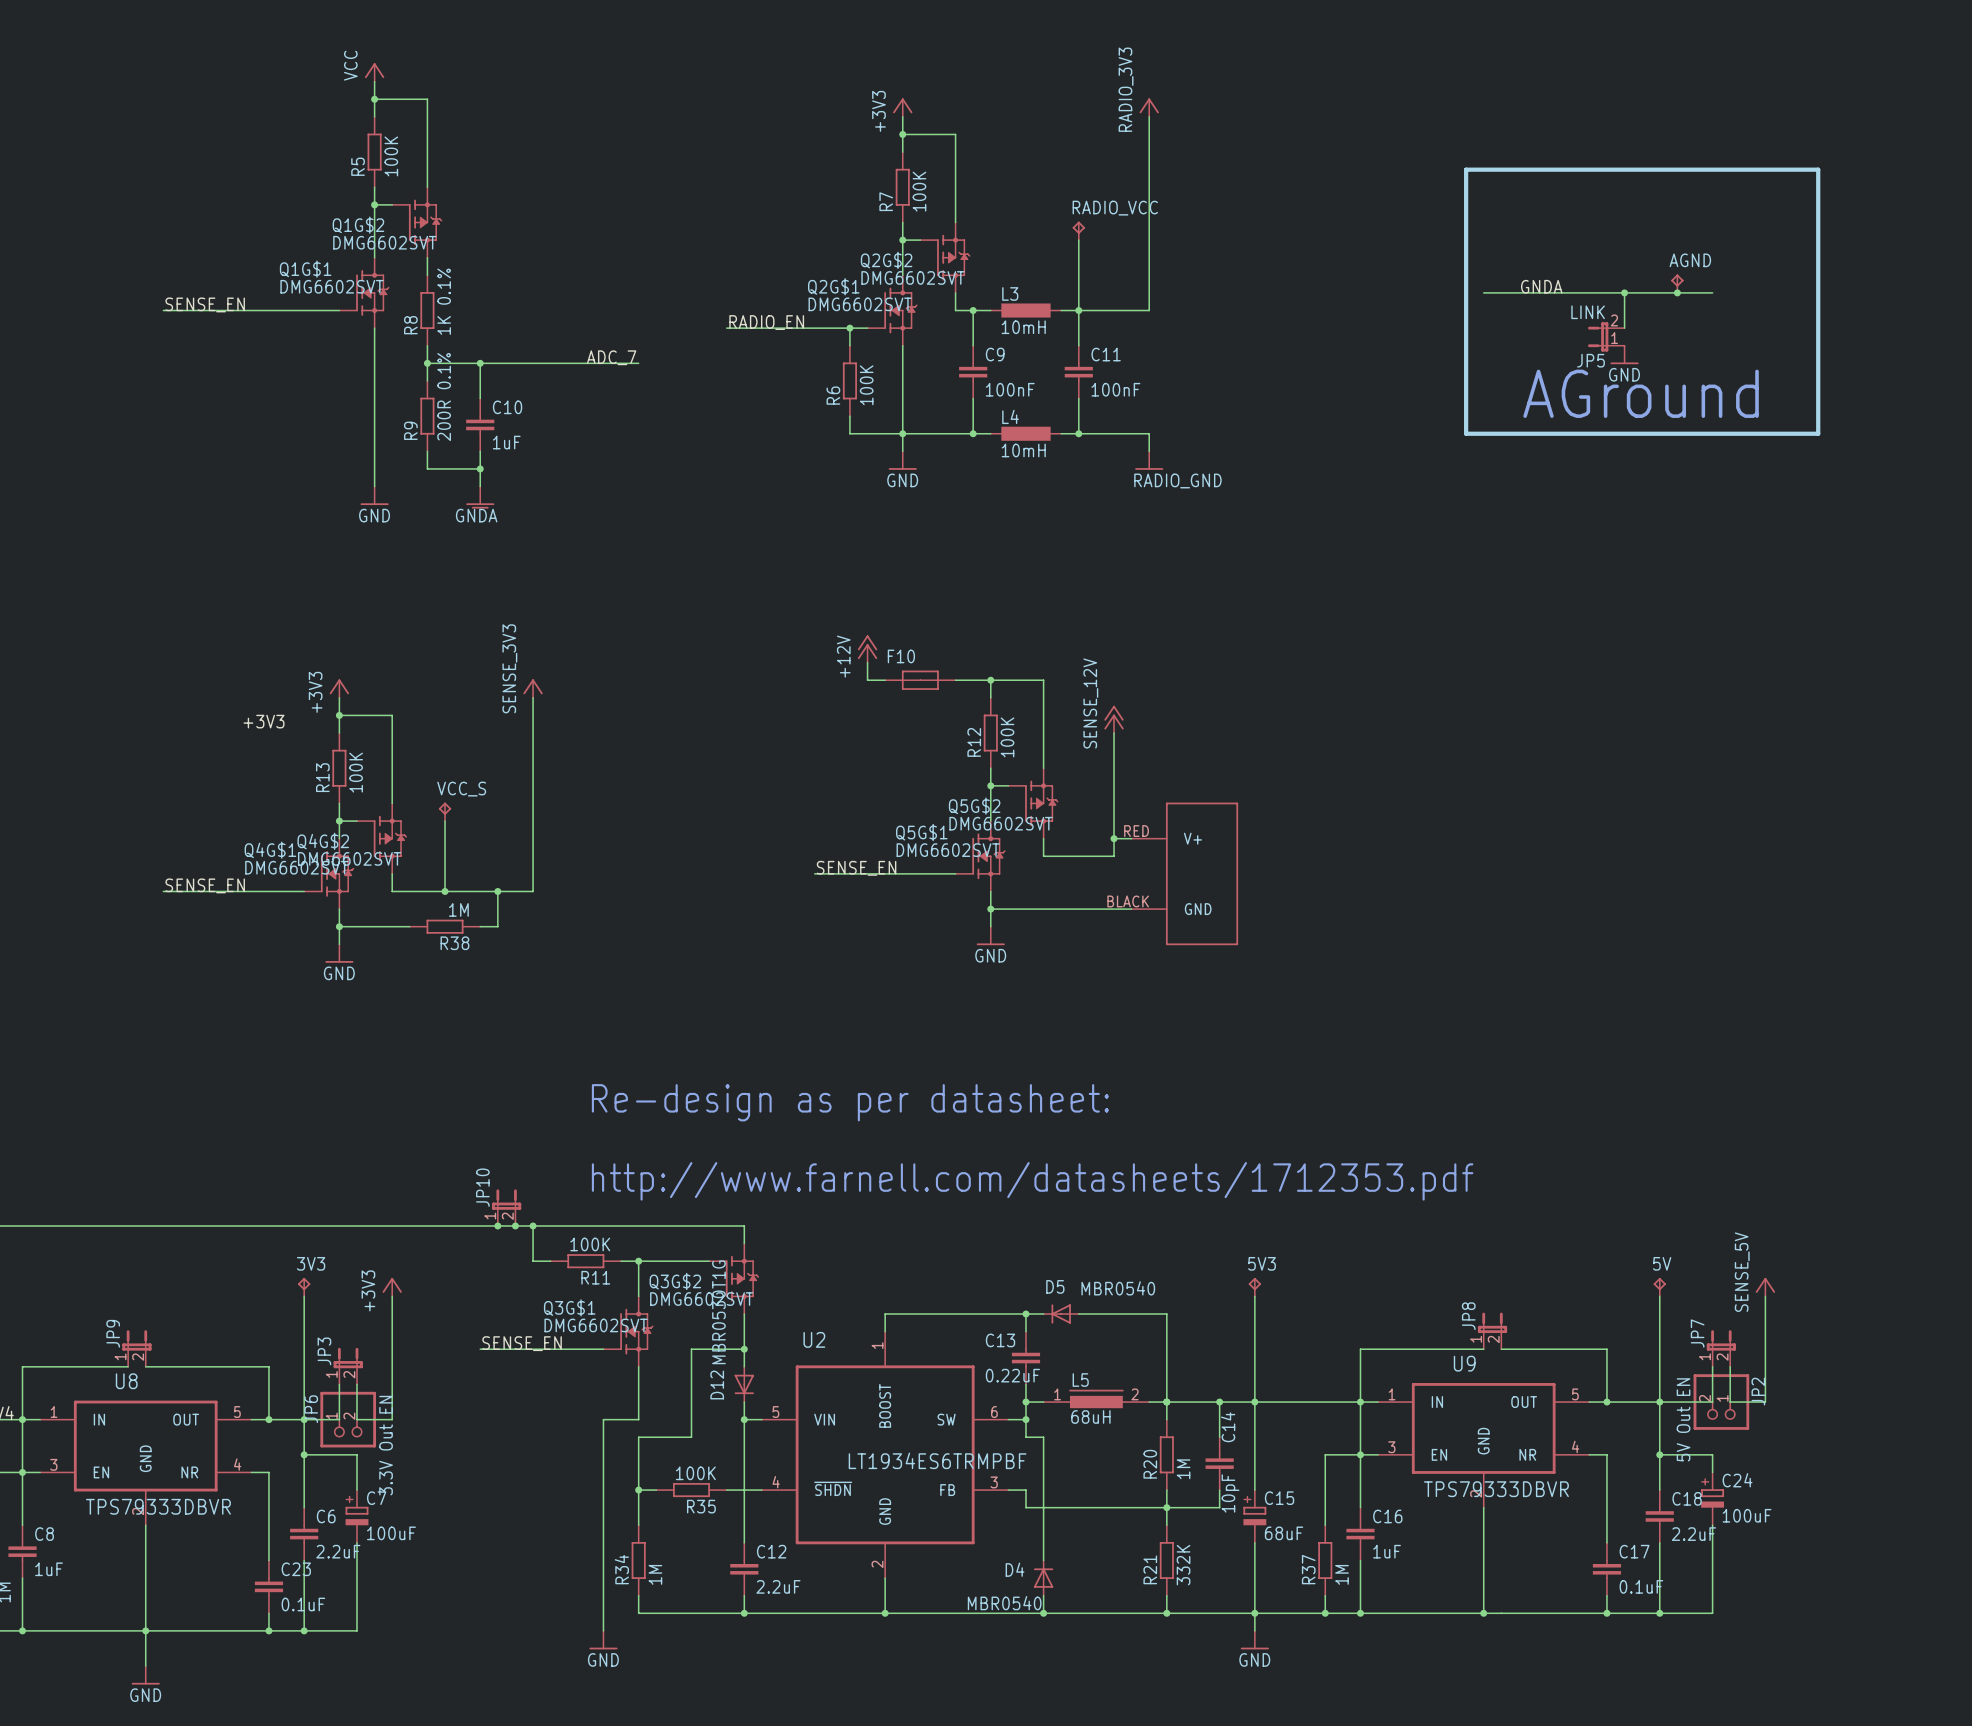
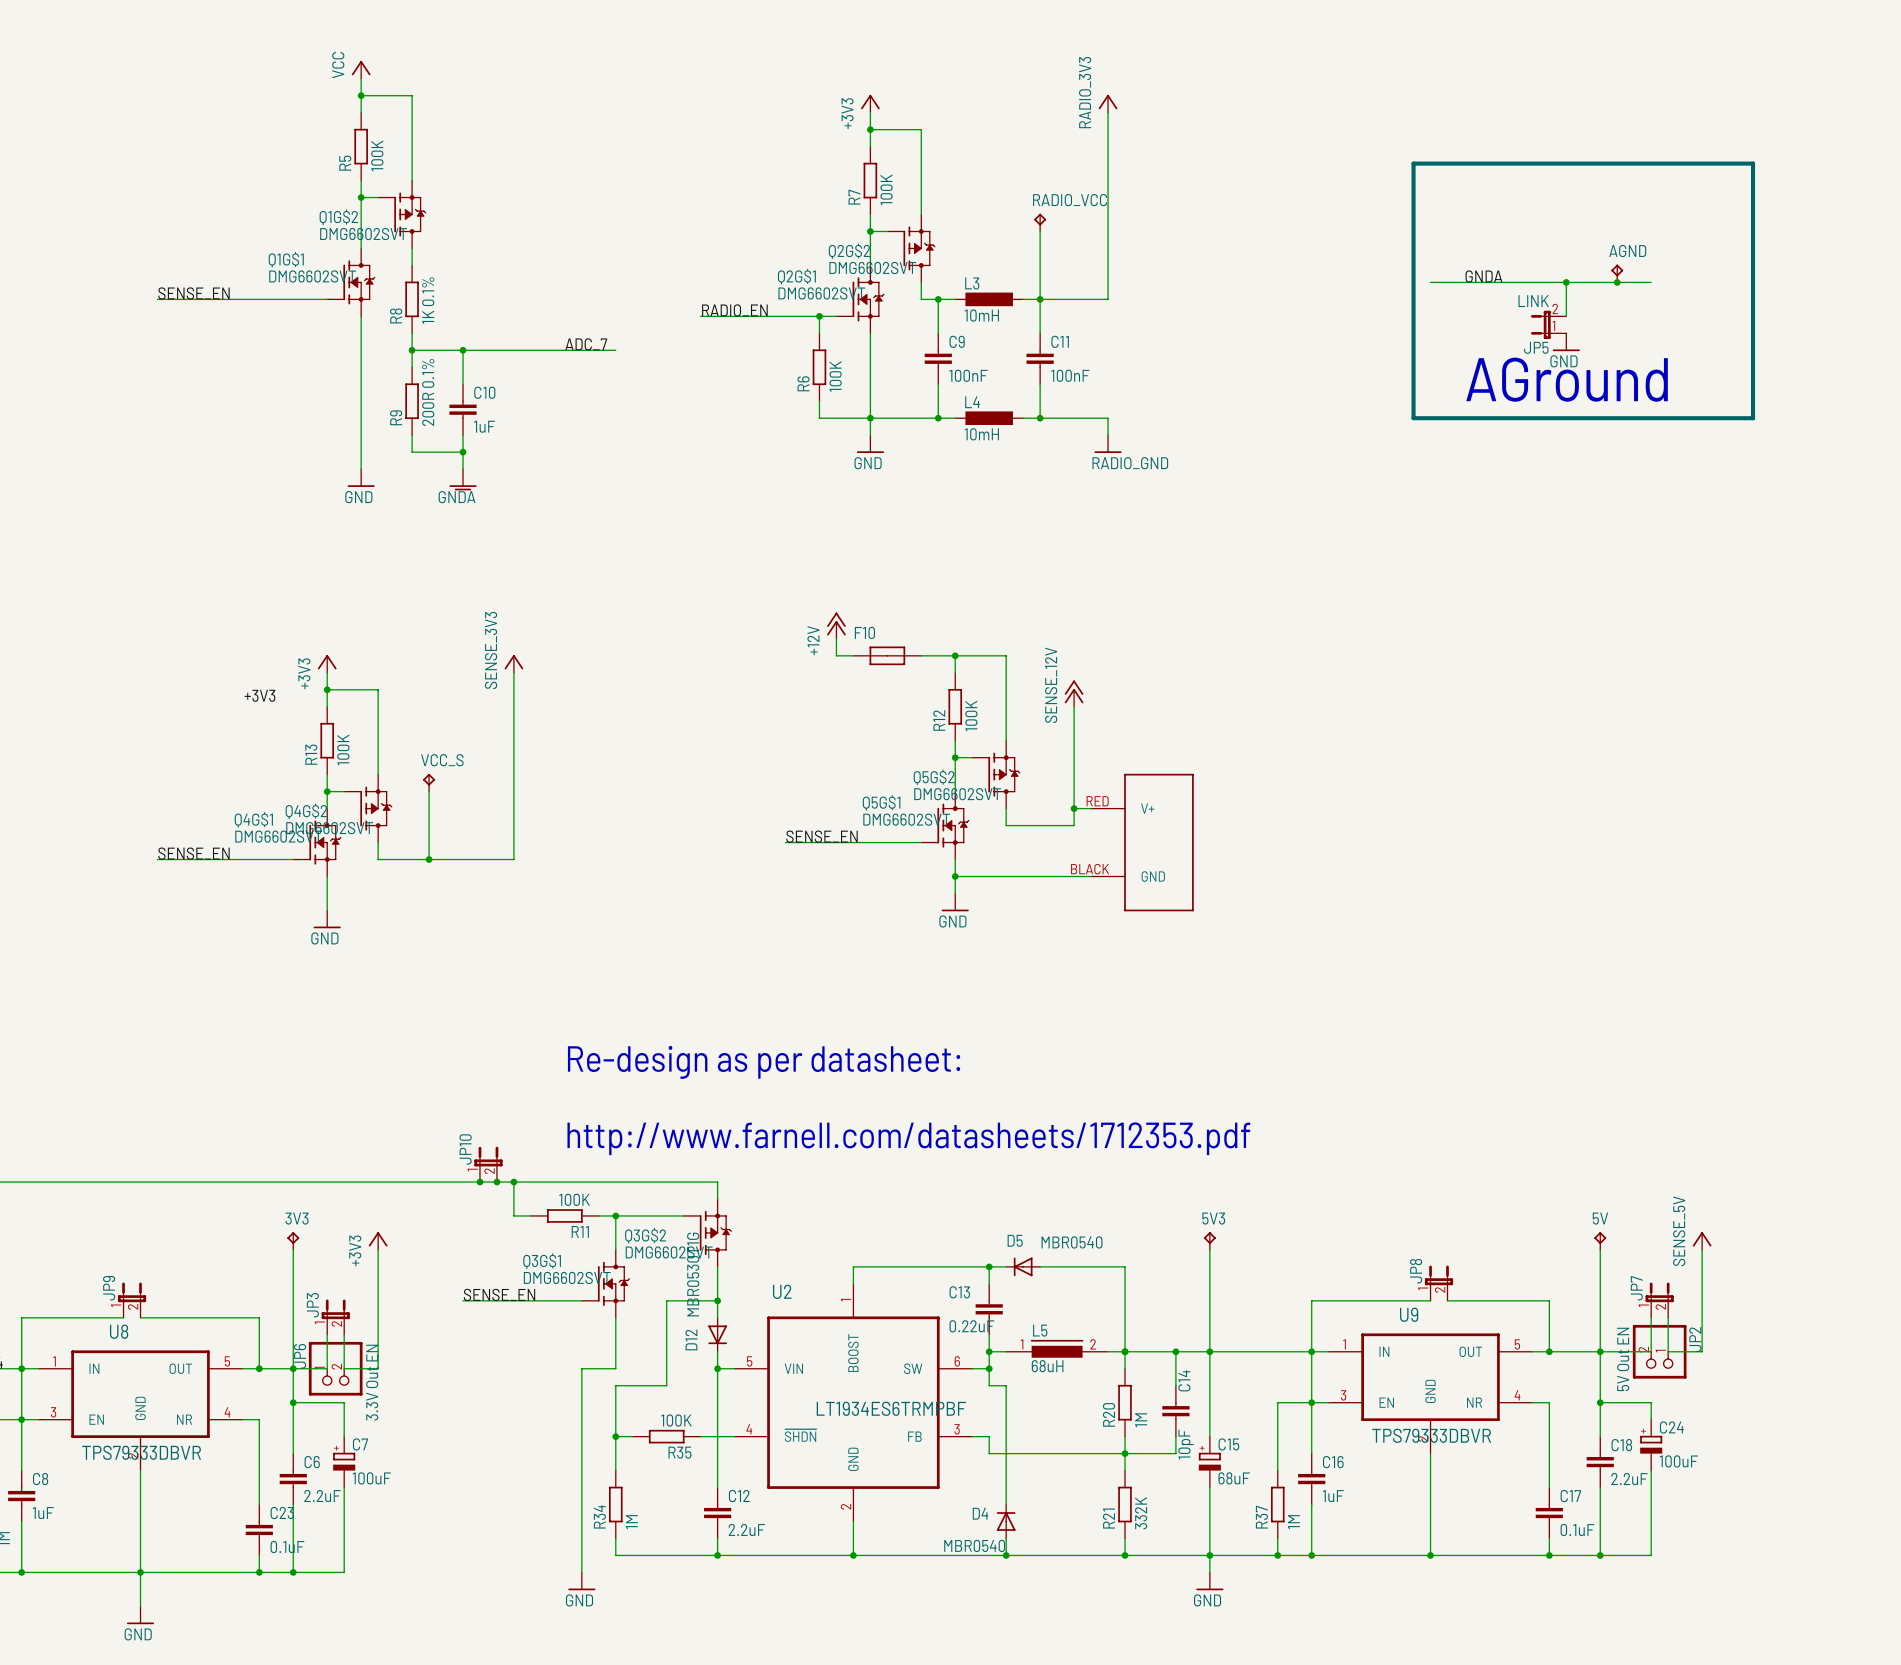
wire: (497, 891) (497, 926) (480, 926) -> none
junction: (497, 891) -> none
wire: (339, 926) (409, 926) -> none
junction: (339, 926) -> none
R38: 1M (445, 926) -> none

